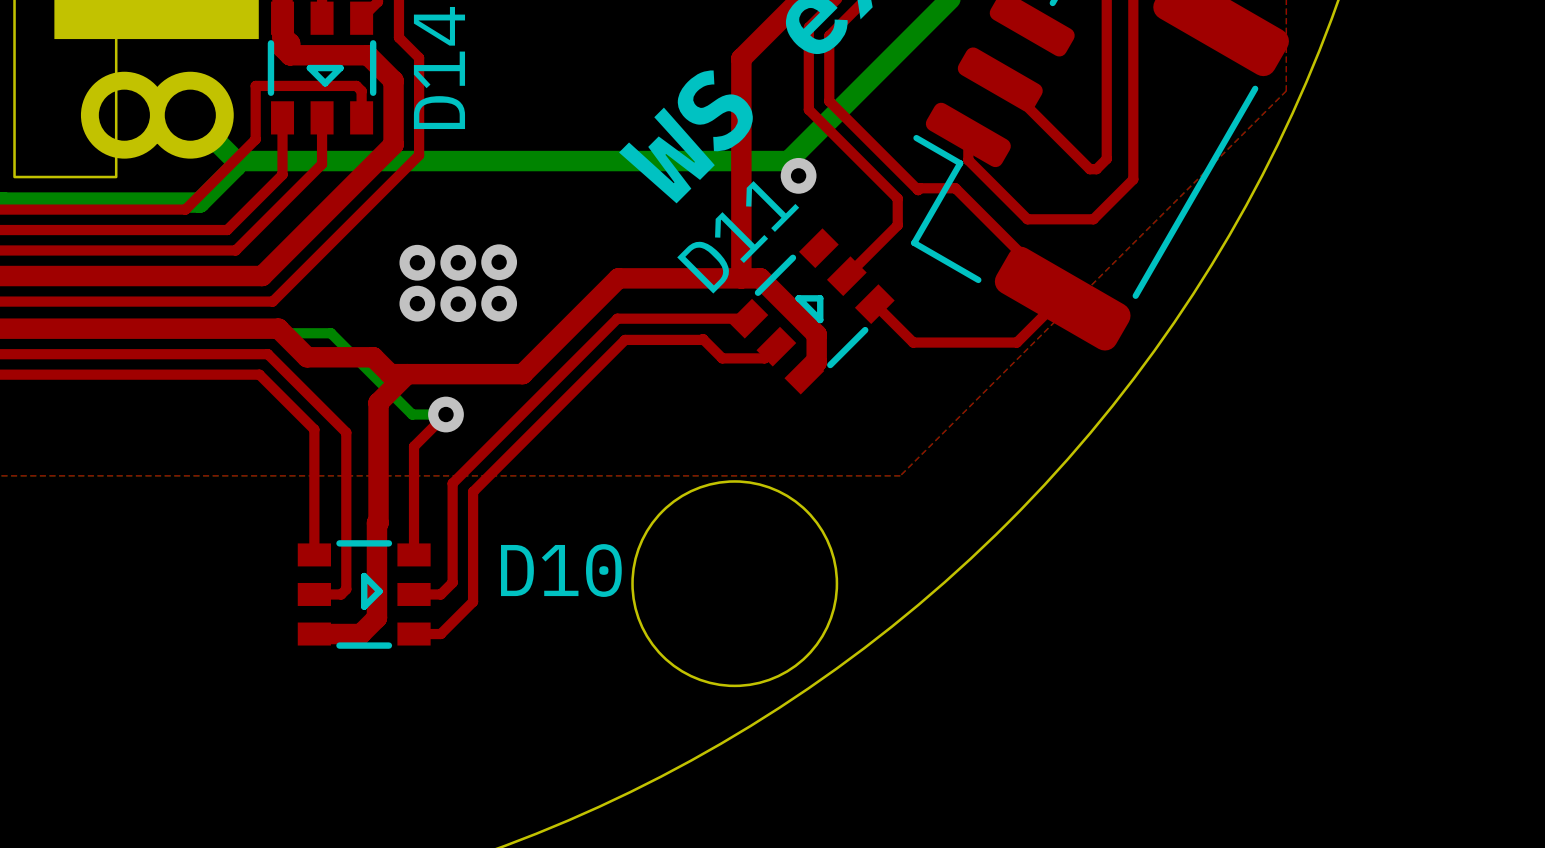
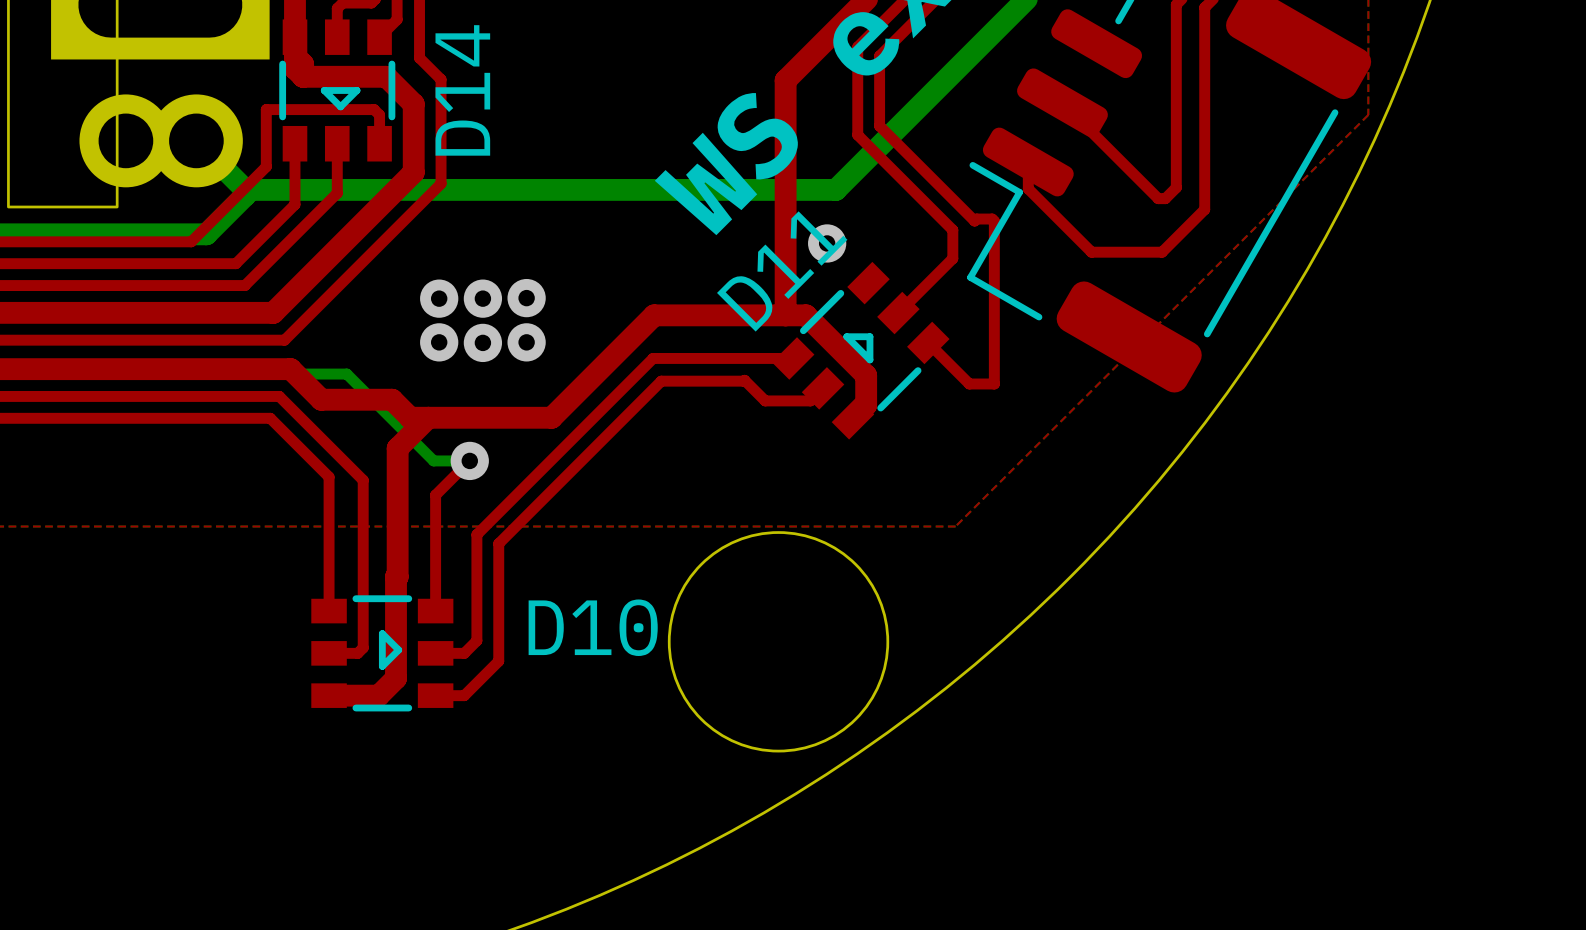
via position: (798, 175) -> (827, 243)
top track: (934, 188) (955, 188) (1051, 284) (1051, 307) (1016, 342) (936, 342) -> (992, 219) (994, 221) (994, 383)

